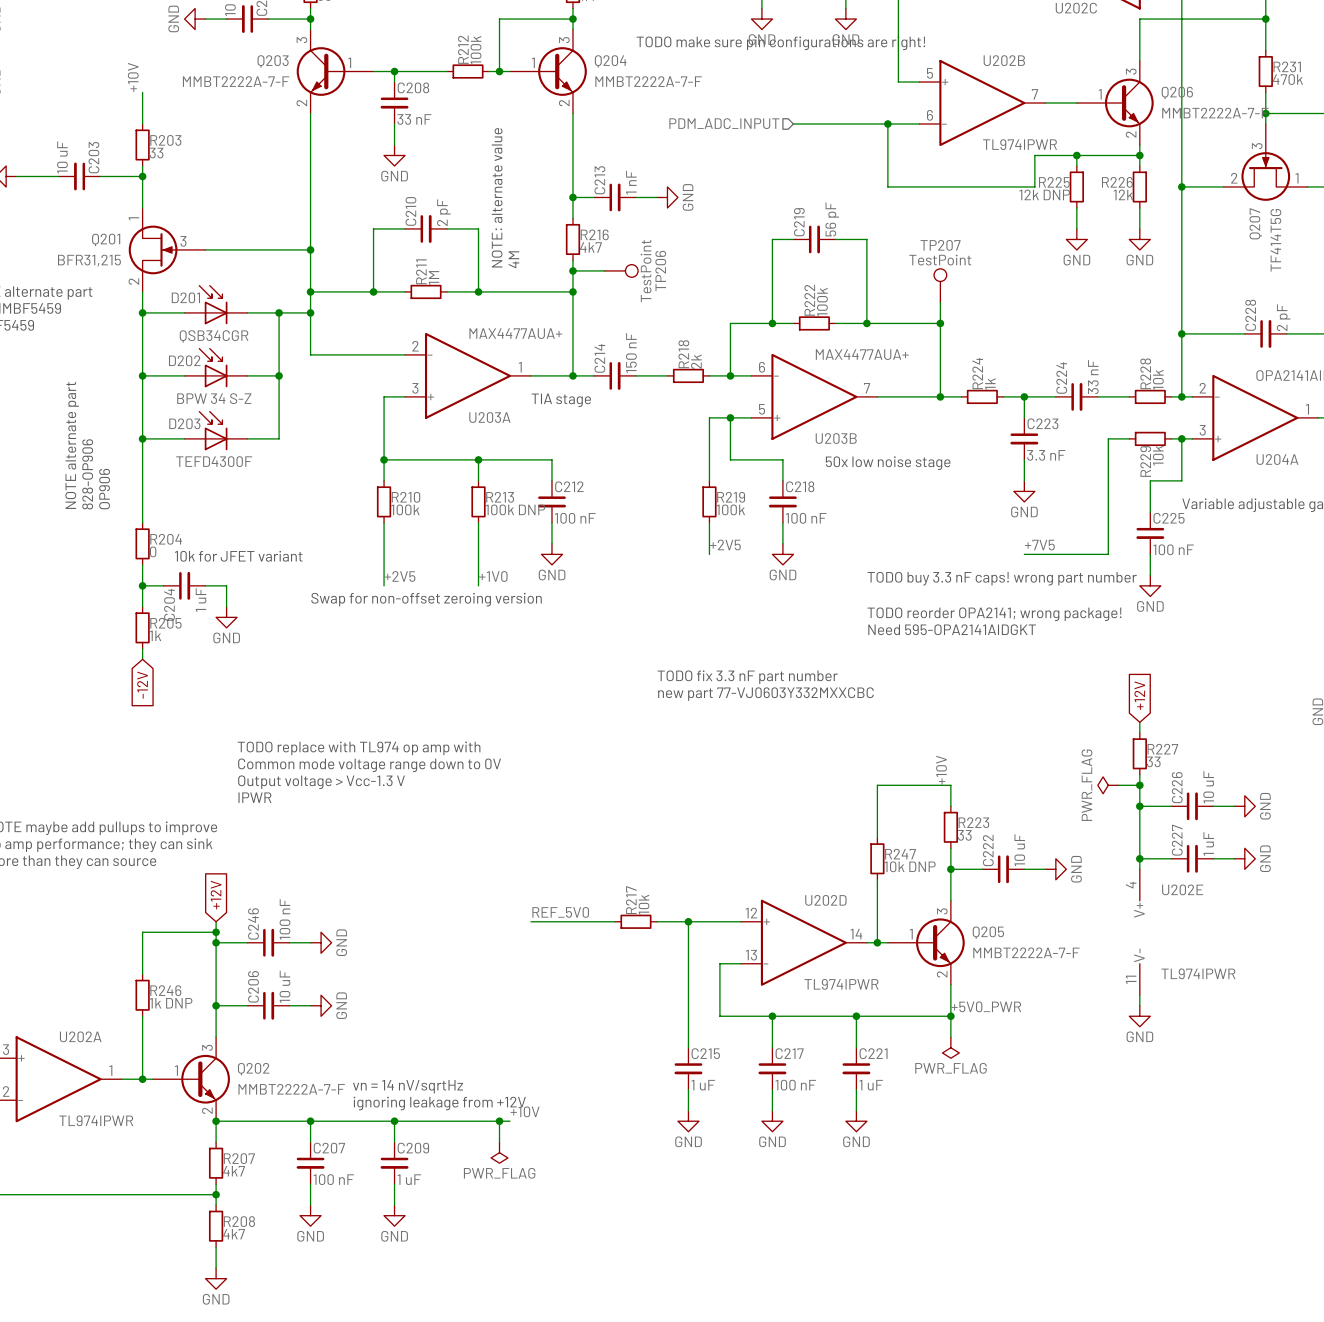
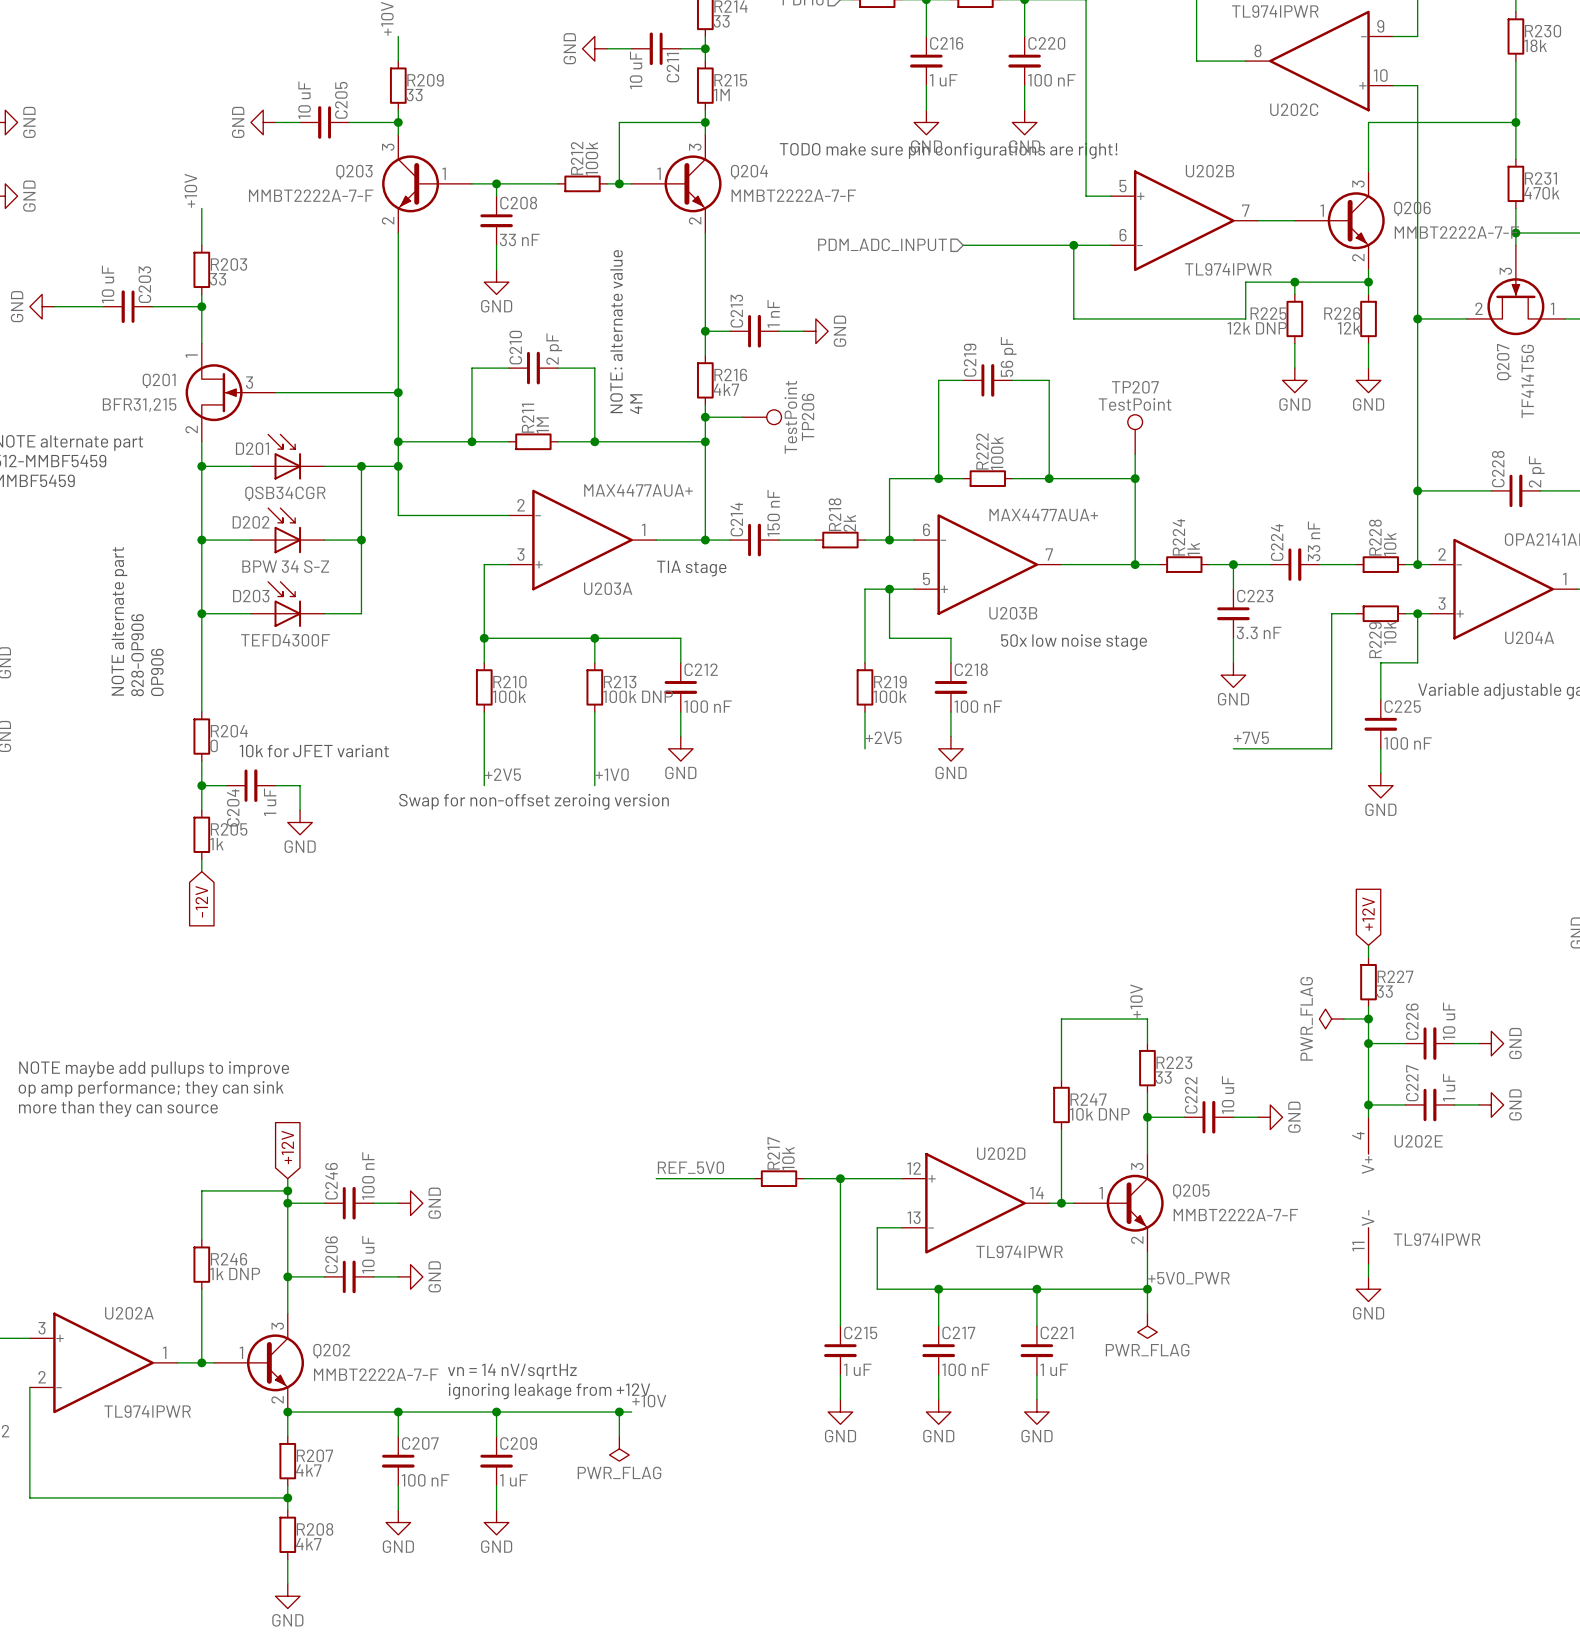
text: TODO buy 3.3 nF caps! wrong part number (1002, 578) -> none
text: TODO reorder OPA2141; wrong package! (994, 614) -> none
text: Need 595-OPA2141AIDGKT (952, 629) -> none
text: TODO fix 3.3 nF part number (747, 677) -> none
text: new part 77-VJ0603Y332MXXCBC (765, 694) -> none
text: TODO replace with TL974 op amp with (359, 748) -> none
text: Common mode voltage range down to 0V (369, 765) -> none
text: Output voltage > Vcc-1.3 V (321, 782) -> none
text: IPWR (254, 797) -> none

